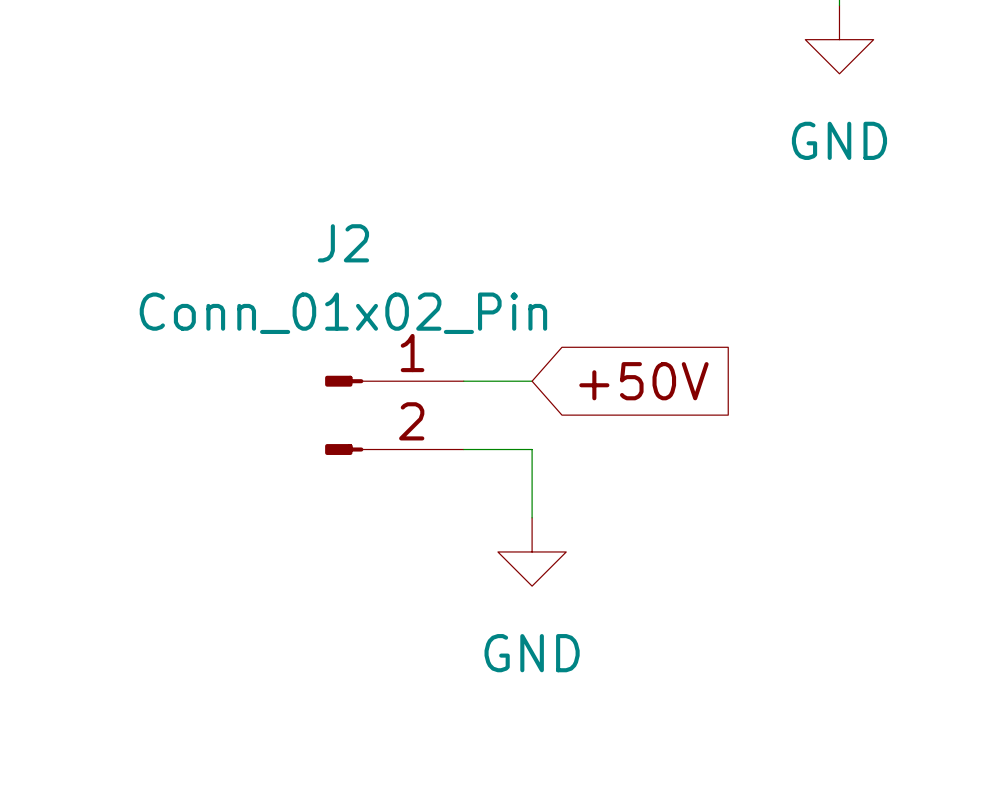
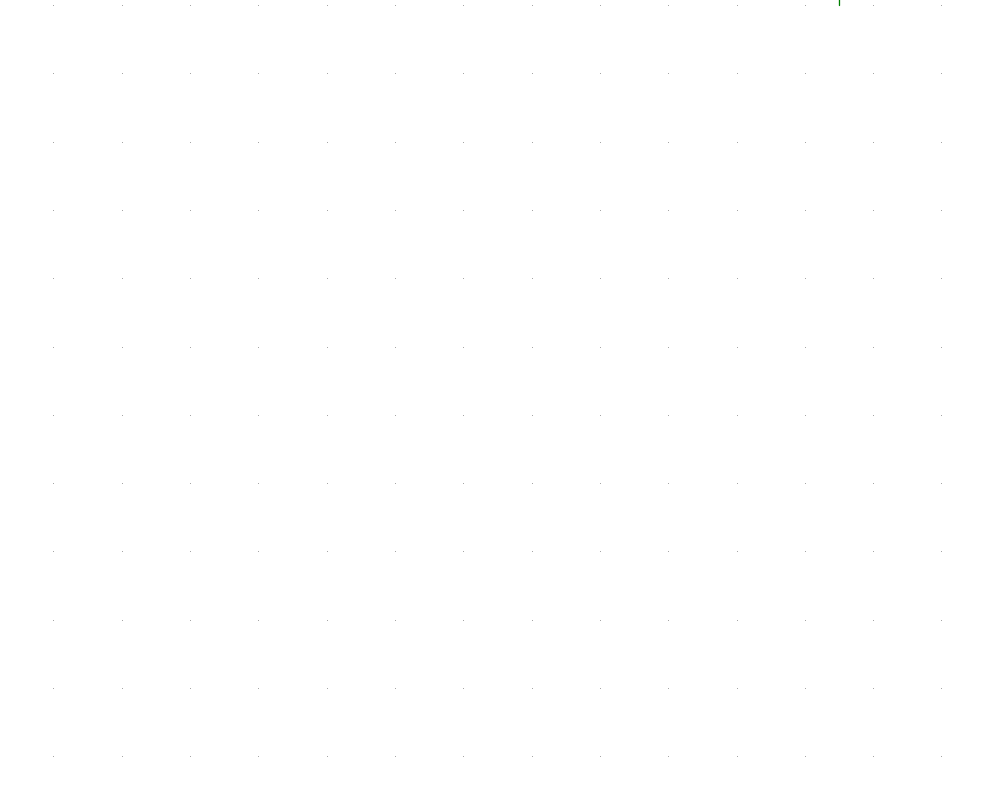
power symbol: GND (839, 39) -> none
wire: (463, 381) (532, 381) -> none
global label: +50V (643, 381) -> none
J2: Conn_01x02_Pin (394, 415) -> none
wire: (463, 449) (532, 449) (532, 517) -> none
power symbol: GND (532, 551) -> none

